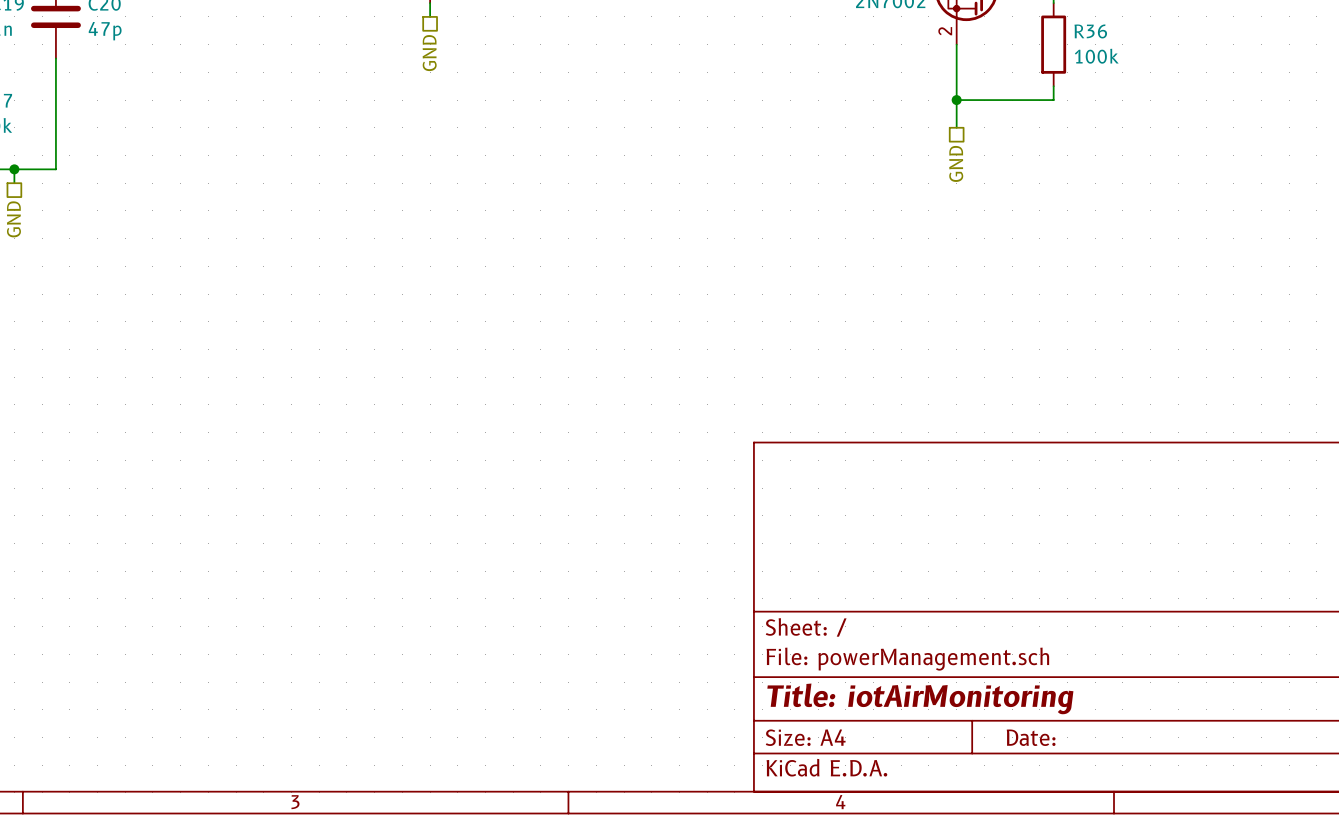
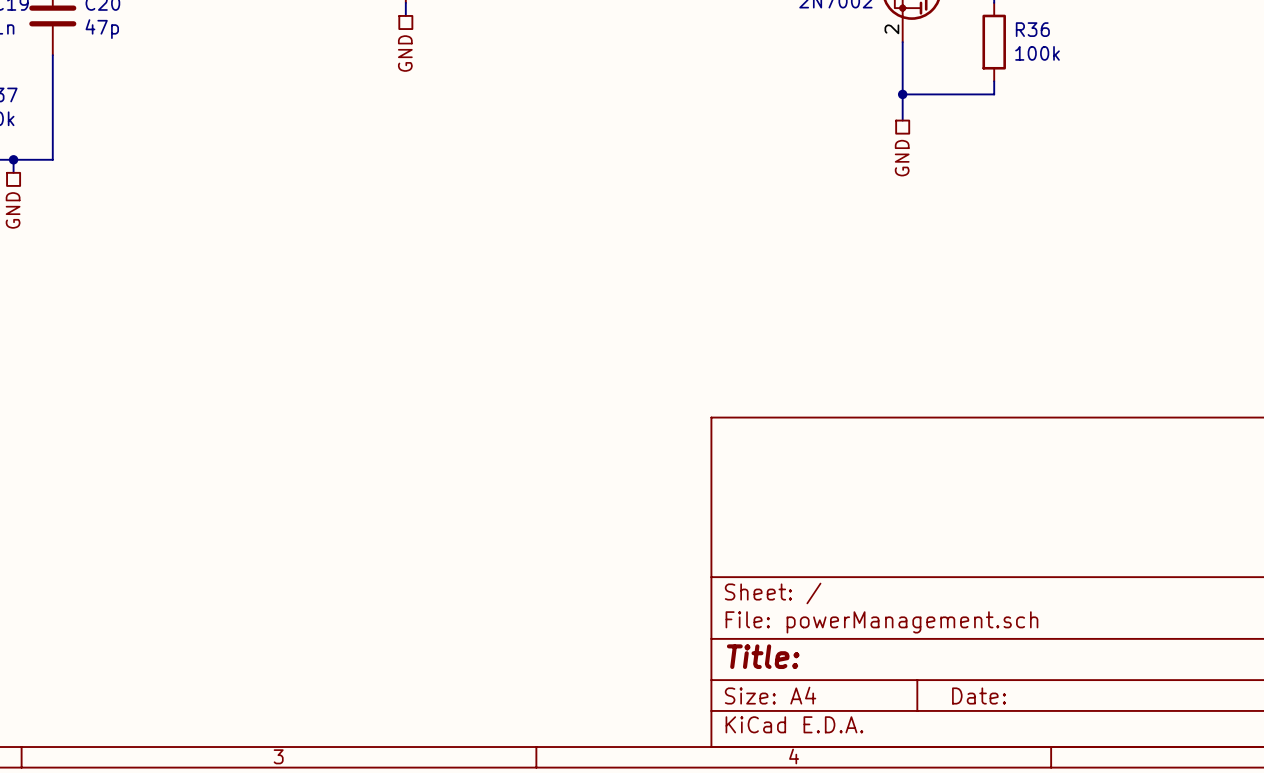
title block: Title: iotAirMonitoring (920, 698) -> Title: (763, 656)

